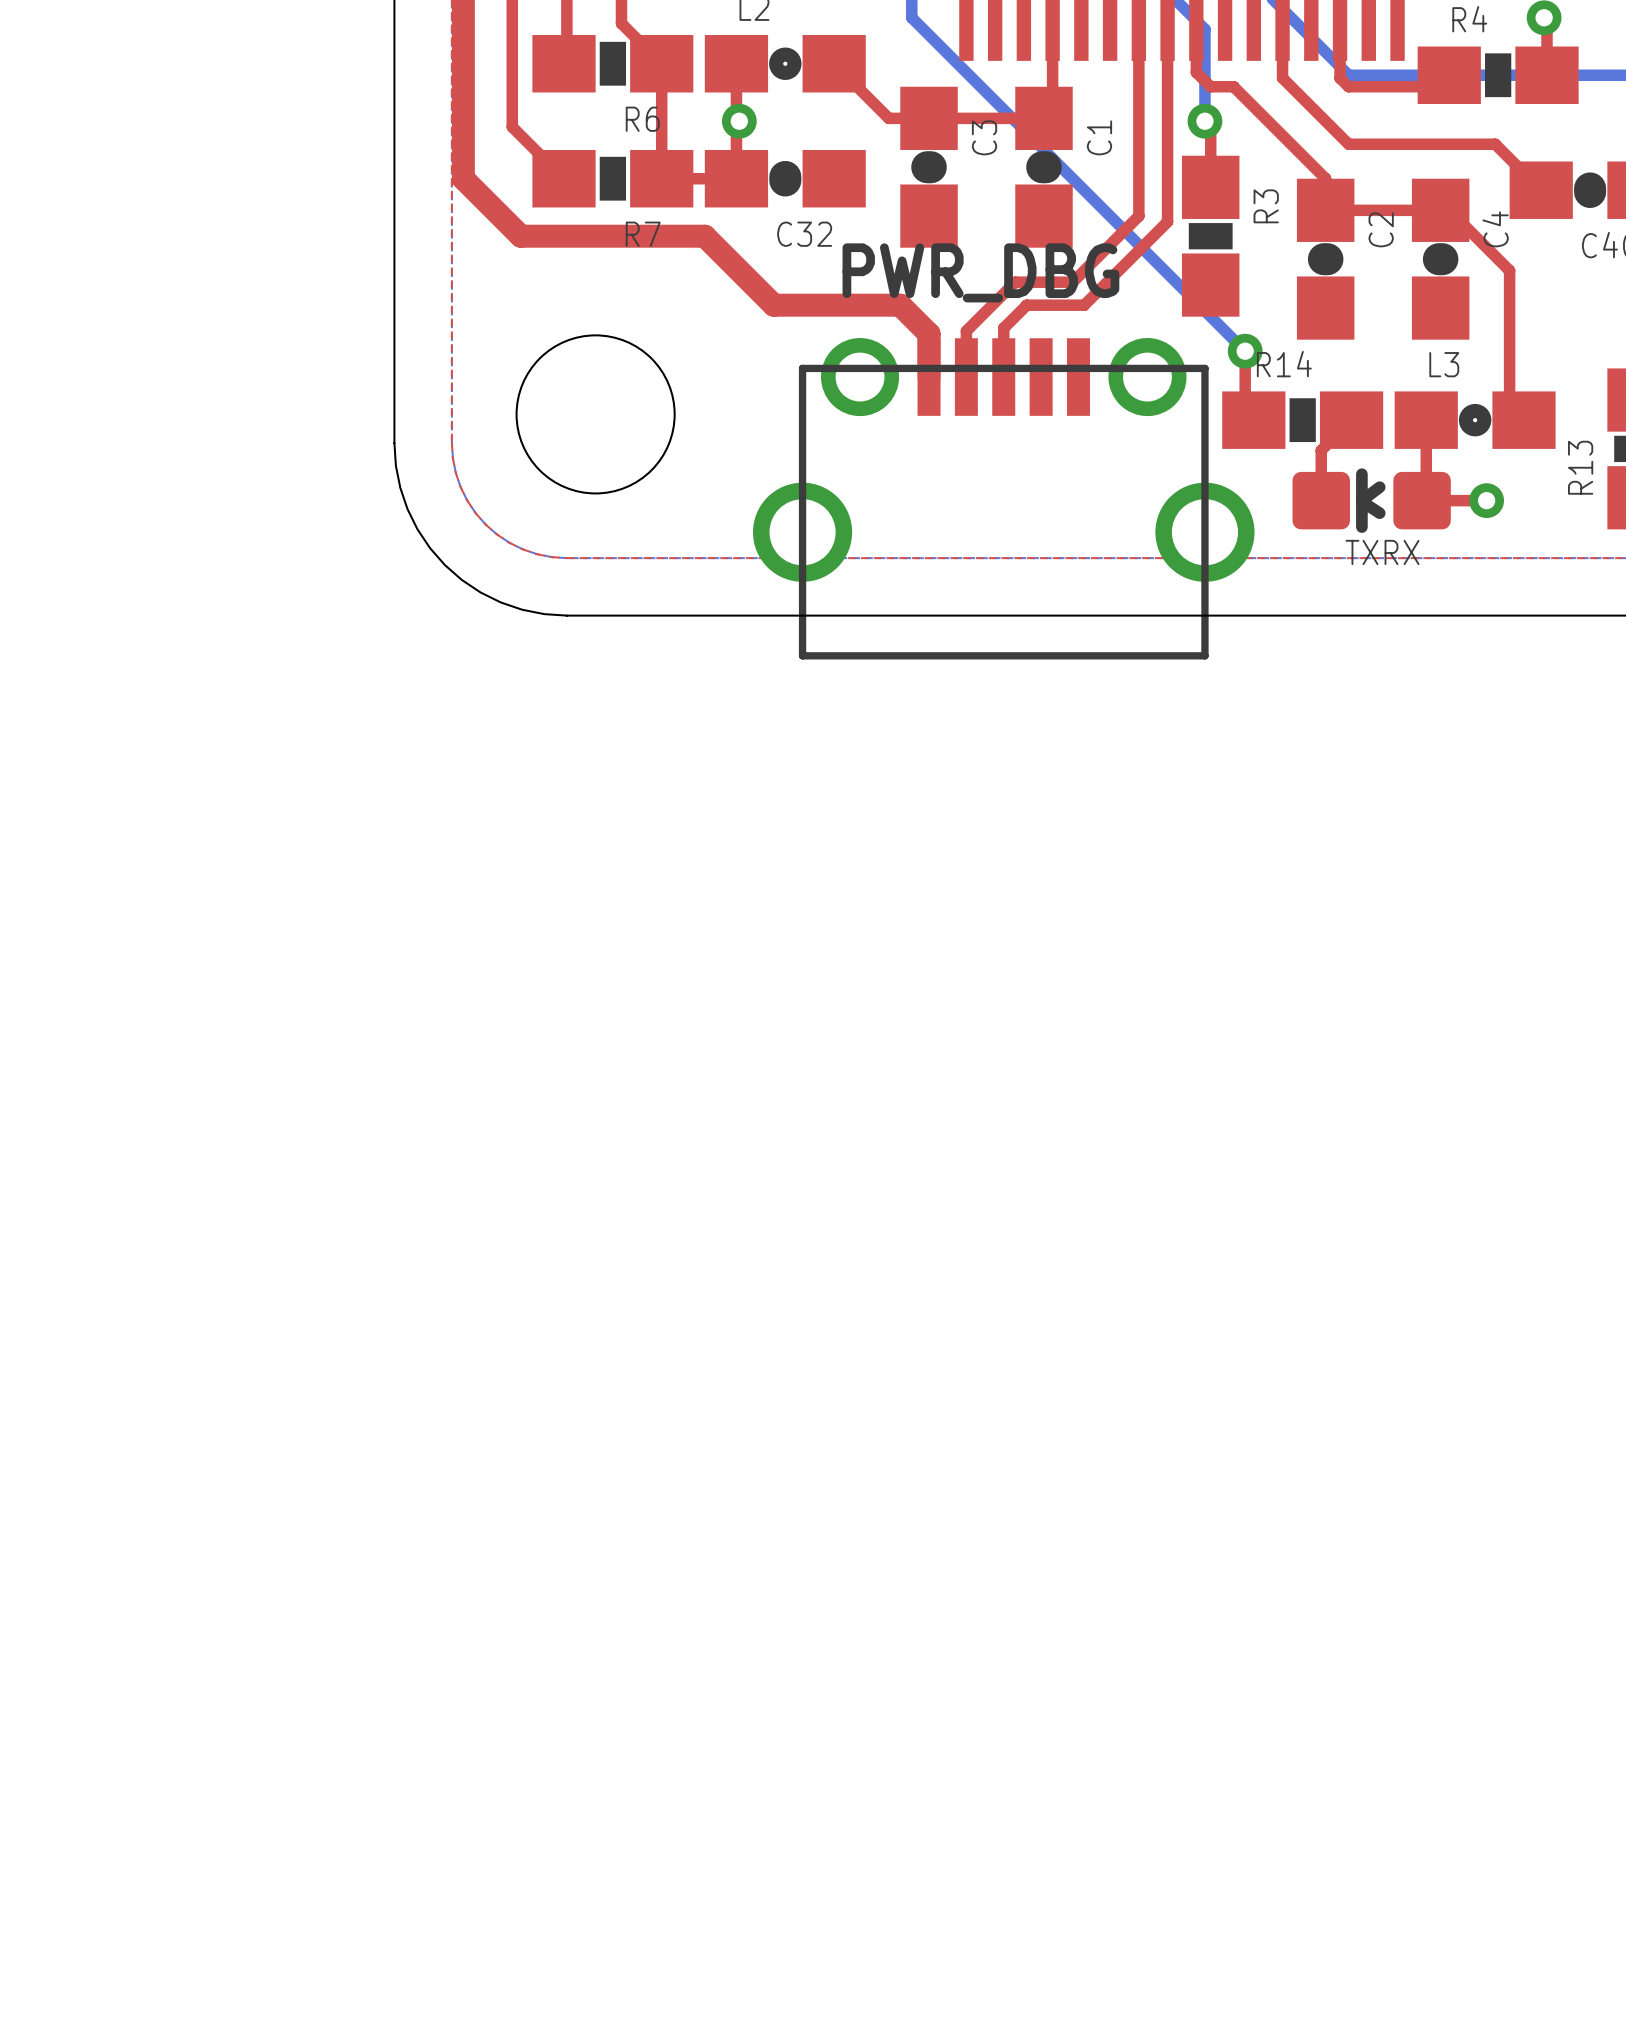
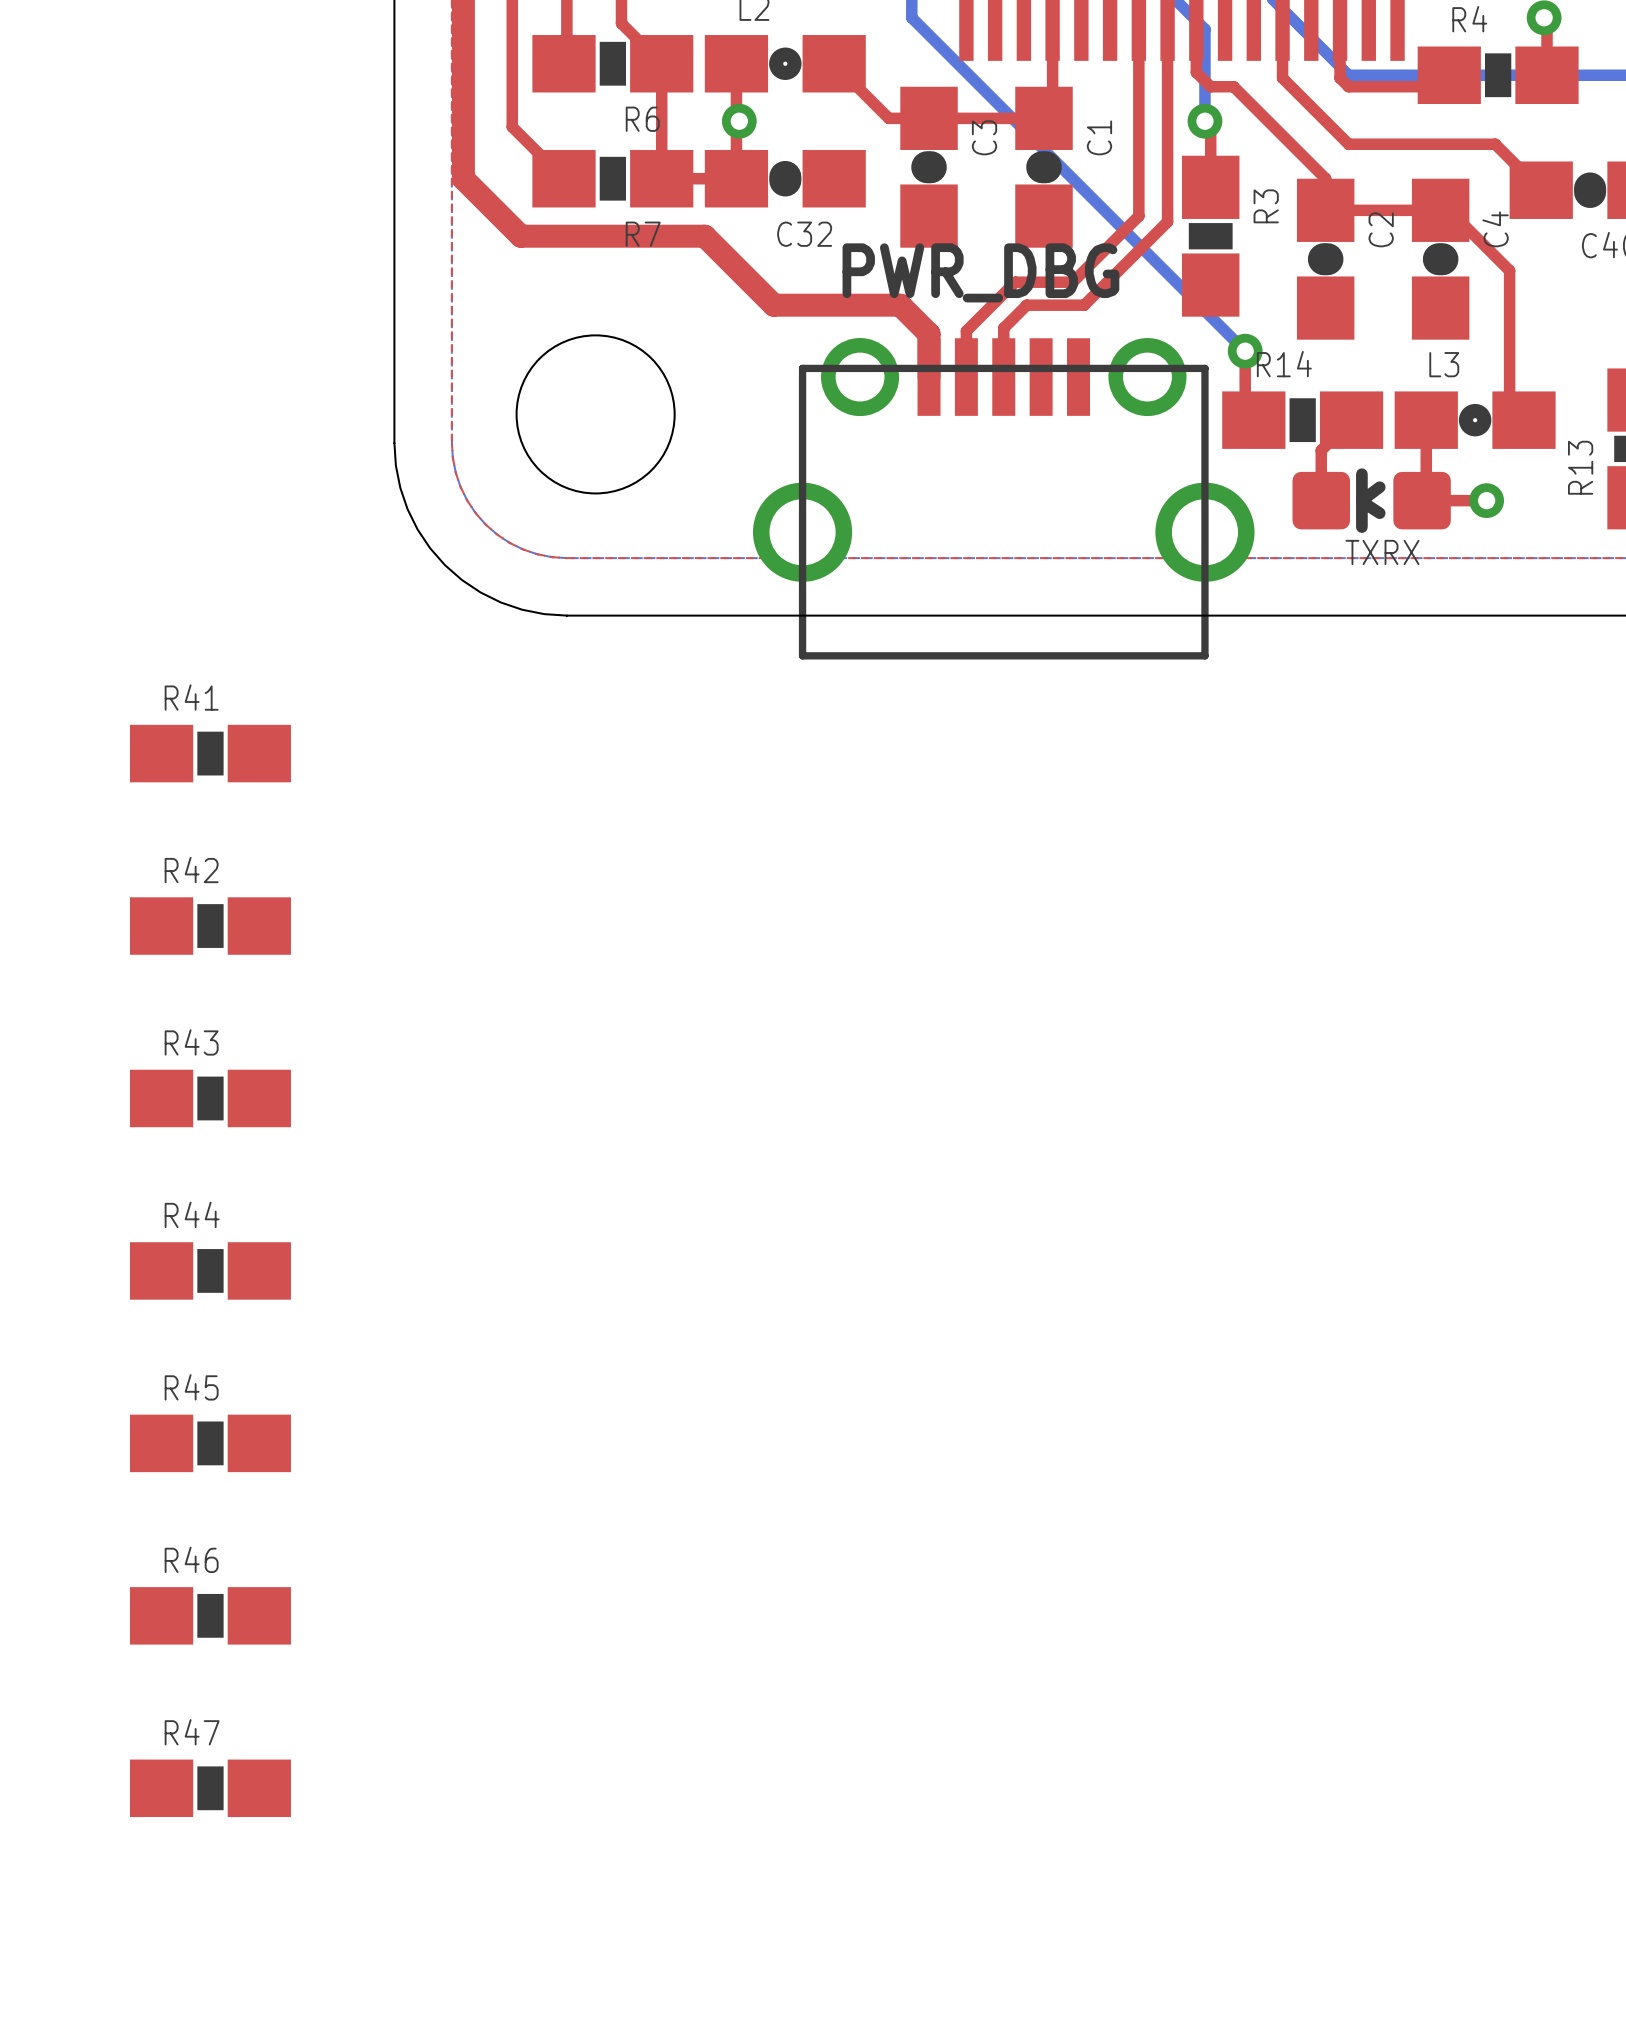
R41: none -> (210, 753)
R42: none -> (210, 926)
R43: none -> (210, 1098)
R44: none -> (210, 1270)
R45: none -> (210, 1443)
R46: none -> (210, 1615)
R47: none -> (210, 1788)

